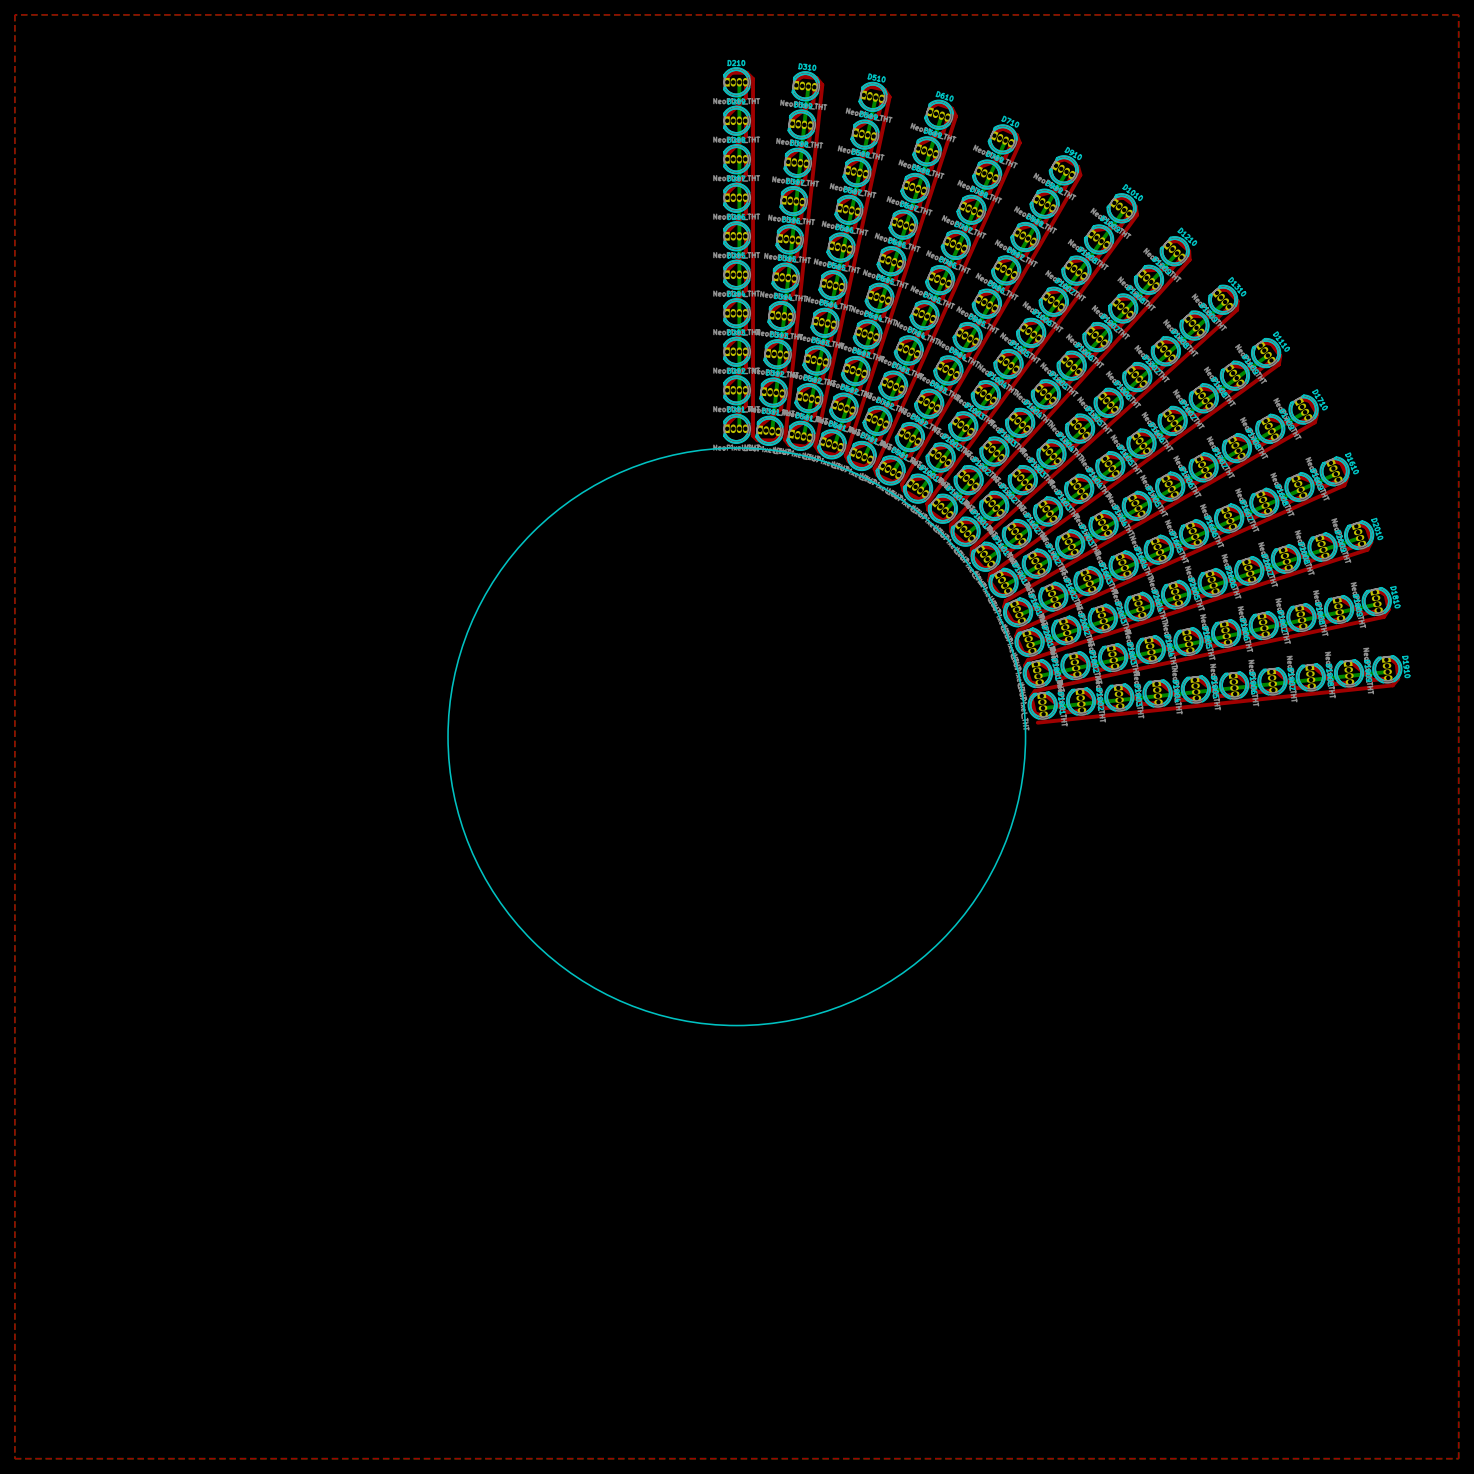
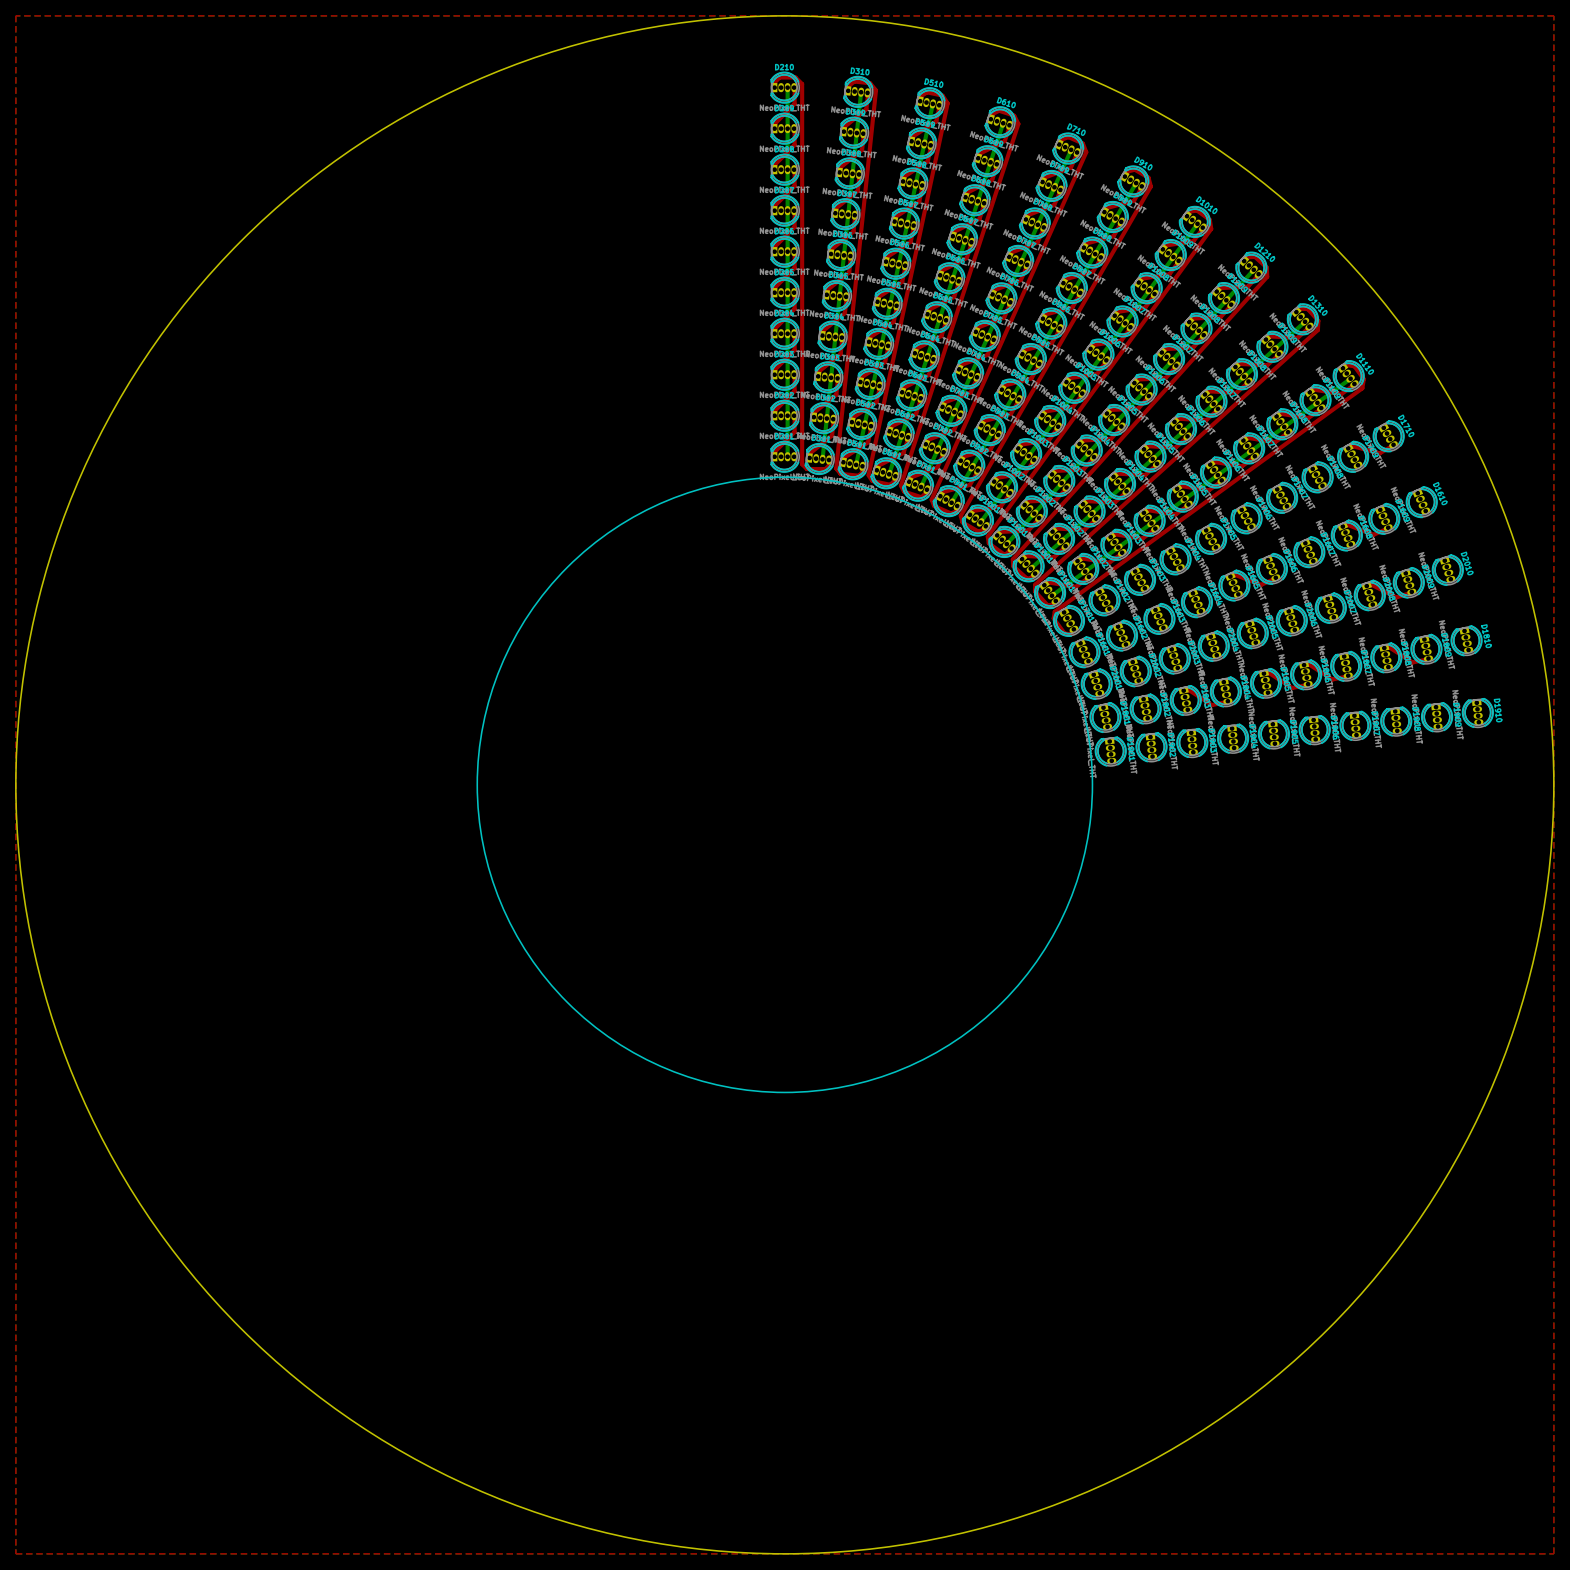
round board edge: none -> [15, 15, 1555, 1555]
top track: (1299, 401) (1303, 399) (1309, 401) (1317, 413) (1314, 422) (1005, 600) (1004, 606) (1012, 621) (1017, 623) (1021, 620) -> none
bottom track: (1304, 412) (1005, 585) -> none
top track: (1275, 437) (1261, 444) (1236, 438) (1232, 440) -> none
top track: (1241, 456) (1228, 464) (1203, 457) (1199, 459) -> none
top track: (1330, 463) (1335, 461) (1341, 463) (1347, 477) (1344, 485) (1018, 630) (1015, 636) (1023, 652) (1027, 653) (1032, 650) -> none
bottom track: (1335, 474) (1019, 615) -> none
top track: (1208, 475) (1195, 483) (1170, 476) (1165, 479) -> none
top track: (1295, 479) (1300, 477) (1324, 486) (1338, 479) -> none
top track: (1175, 494) (1161, 502) (1136, 495) (1132, 498) -> none
top track: (1225, 510) (1230, 508) (1254, 517) (1268, 511) -> none
top track: (1141, 514) (1128, 521) (1103, 515) (1099, 517) -> none
top track: (1190, 526) (1194, 524) (1219, 533) (1233, 527) -> none
top track: (1356, 526) (1360, 524) (1366, 527) (1371, 542) (1367, 549) (1027, 660) (1025, 665) (1030, 682) (1036, 683) (1039, 682) -> none
top track: (1108, 533) (1095, 541) (1070, 534) (1065, 536) -> none
top track: (1319, 538) (1324, 537) (1347, 548) (1361, 543) -> none
bottom track: (1359, 538) (1030, 645) -> none
top track: (1075, 552) (1061, 560) (1036, 553) (1032, 556) -> none
top track: (1120, 557) (1124, 555) (1148, 564) (1162, 558) -> none
top track: (1246, 562) (1251, 560) (1274, 572) (1288, 568) -> none
top track: (1041, 571) (1028, 579) (1002, 572) (998, 574) -> none
top track: (1084, 573) (1089, 571) (1113, 580) (1127, 574) -> none
top track: (1209, 574) (1214, 572) (1237, 584) (1252, 579) -> none
top track: (1173, 586) (1177, 584) (1201, 596) (1215, 591) -> none
top track: (1049, 588) (1054, 586) (1078, 596) (1092, 589) -> none
top track: (1375, 592) (1379, 591) (1385, 595) (1388, 609) (1383, 616) (1034, 691) (1031, 696) (1034, 713) (1043, 714) -> none
top track: (1136, 598) (1141, 596) (1164, 608) (1179, 603) -> none
top track: (1337, 600) (1341, 599) (1363, 613) (1378, 610) -> none
top track: (1014, 603) (1018, 602) (1043, 611) (1057, 605) -> none
bottom track: (1376, 604) (1038, 676) -> none
top track: (1100, 610) (1104, 608) (1127, 620) (1142, 615) -> none
top track: (1261, 616) (1266, 615) (1288, 629) (1303, 626) -> none
top track: (1063, 621) (1068, 620) (1091, 632) (1105, 627) -> none
top track: (1026, 633) (1030, 632) (1054, 644) (1069, 639) -> none
top track: (1148, 640) (1153, 639) (1175, 653) (1190, 650) -> none
top track: (1073, 656) (1078, 655) (1100, 669) (1115, 666) -> none
top track: (1386, 660) (1391, 659) (1396, 663) (1398, 678) (1392, 685) (1037, 722) -> none
top track: (1035, 664) (1040, 663) (1062, 677) (1077, 674) -> none
top track: (1348, 664) (1352, 663) (1373, 680) (1388, 678) -> none
top track: (1309, 668) (1314, 667) (1334, 684) (1350, 682) -> none
bottom track: (1387, 671) (1043, 708) -> none
top track: (1271, 672) (1276, 671) (1296, 688) (1311, 686) -> none
top track: (1233, 676) (1238, 675) (1258, 692) (1273, 690) -> none
top track: (1194, 680) (1199, 679) (1219, 696) (1235, 694) -> none
top track: (1156, 684) (1161, 683) (1181, 700) (1196, 698) -> none
top track: (1118, 688) (1123, 687) (1143, 704) (1158, 702) -> none
top track: (1080, 692) (1084, 691) (1105, 708) (1120, 706) -> none
top track: (1041, 696) (1046, 695) (1066, 712) (1082, 710) -> none

